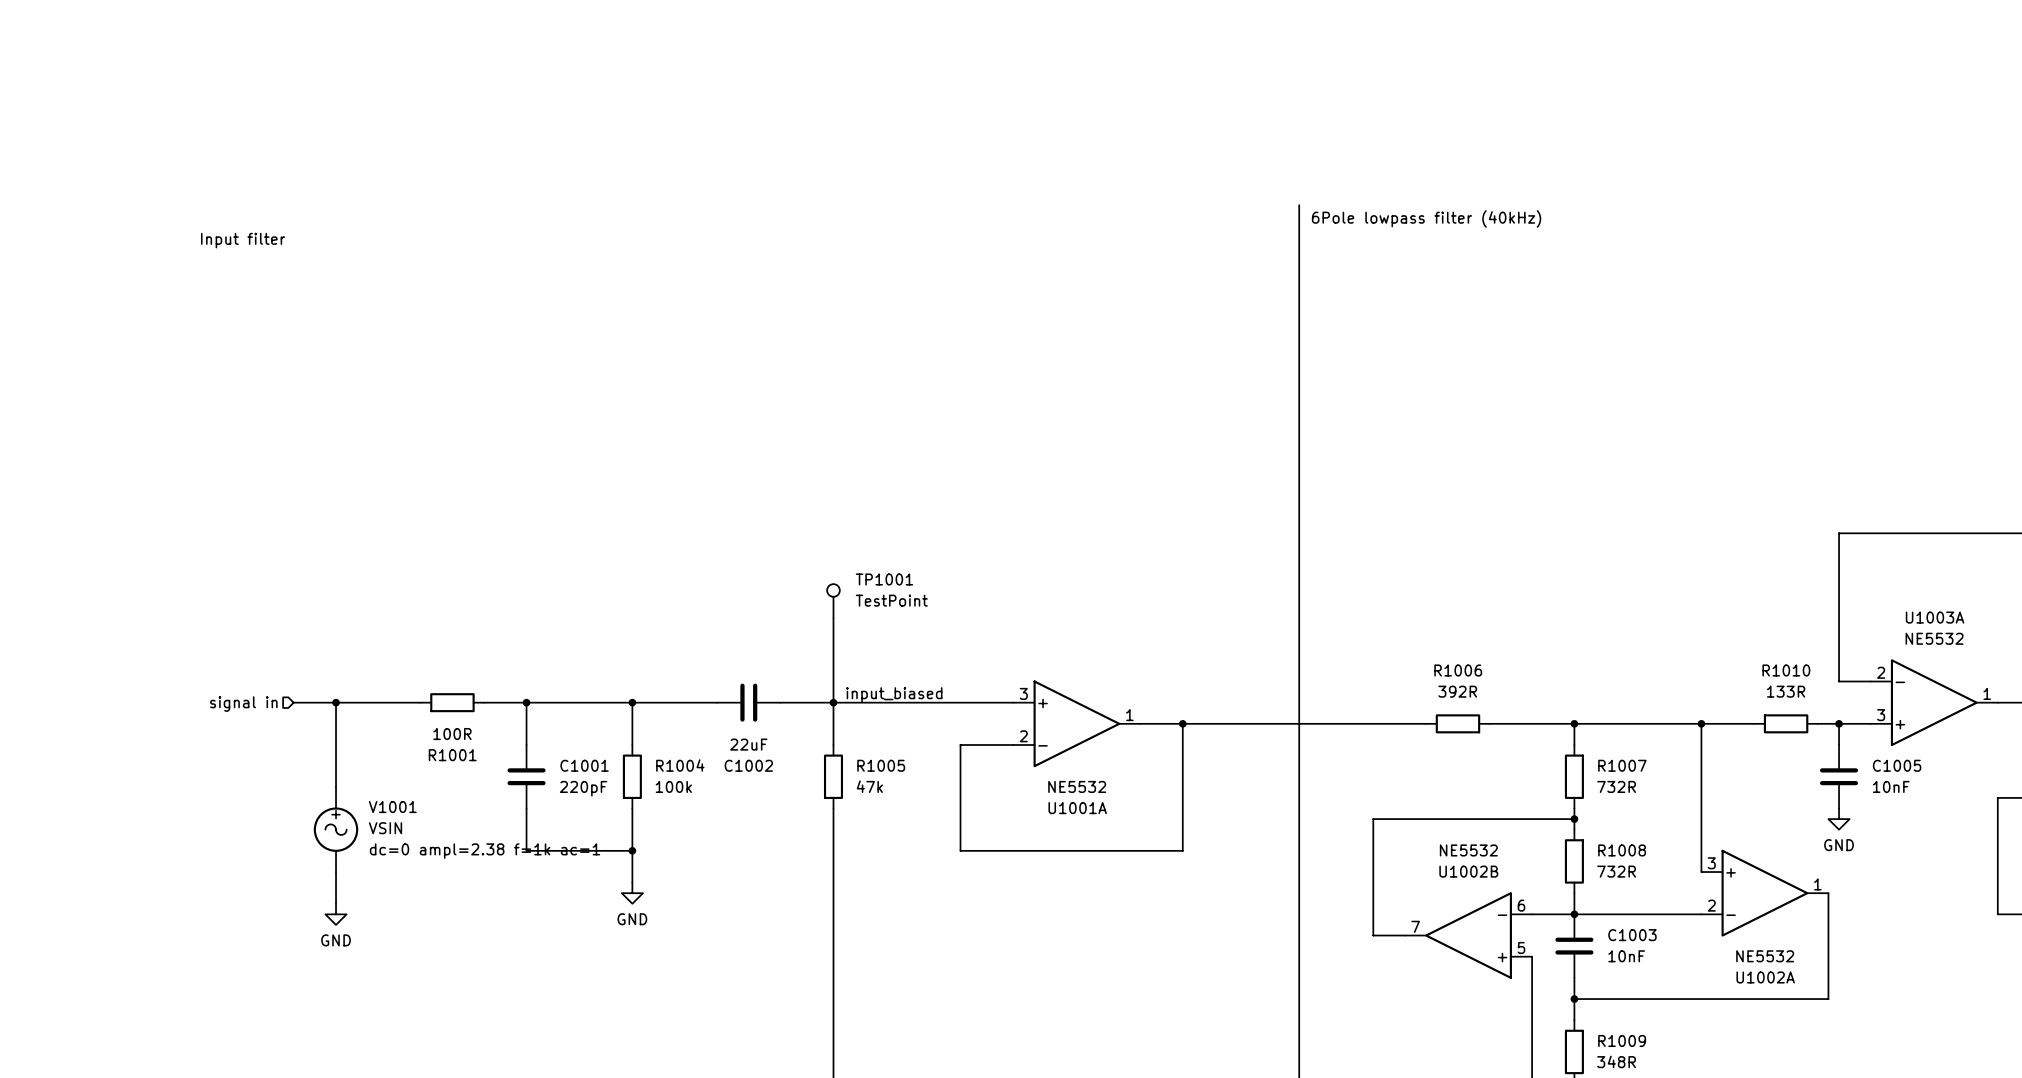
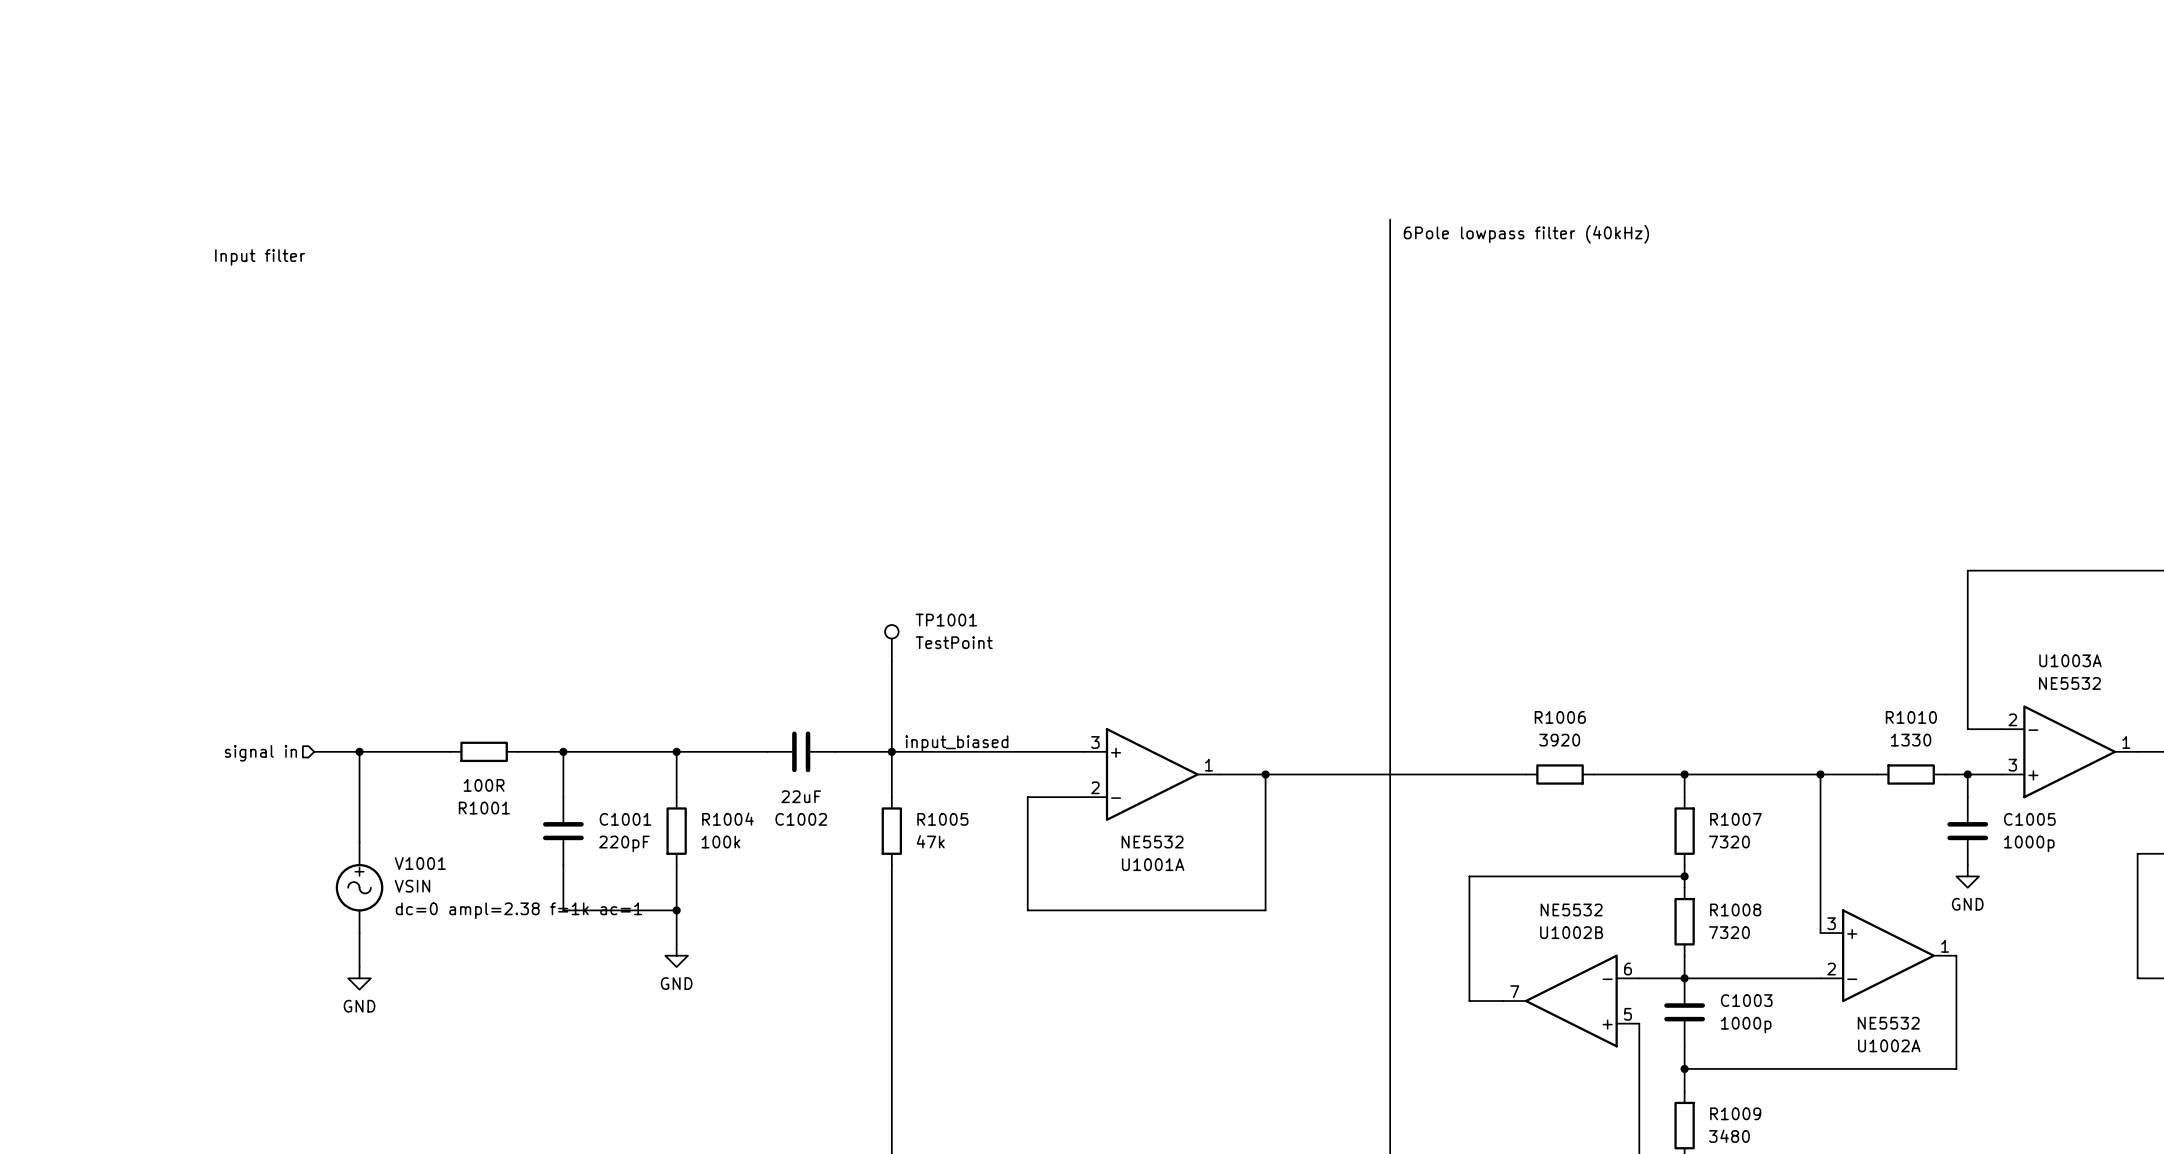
R1006 value: 392R (1457, 691) -> 3920 (1559, 740)
R1010 value: 133R (1786, 691) -> 1330 (1911, 740)
R1007 value: 732R (1616, 786) -> 7320 (1729, 842)
C1005 value: 10nF (1891, 786) -> 1000p (2029, 843)
R1008 value: 732R (1616, 871) -> 7320 (1729, 932)
C1003 value: 10nF (1626, 956) -> 1000p (1746, 1025)
R1009 value: 348R (1616, 1061) -> 3480 (1729, 1136)

